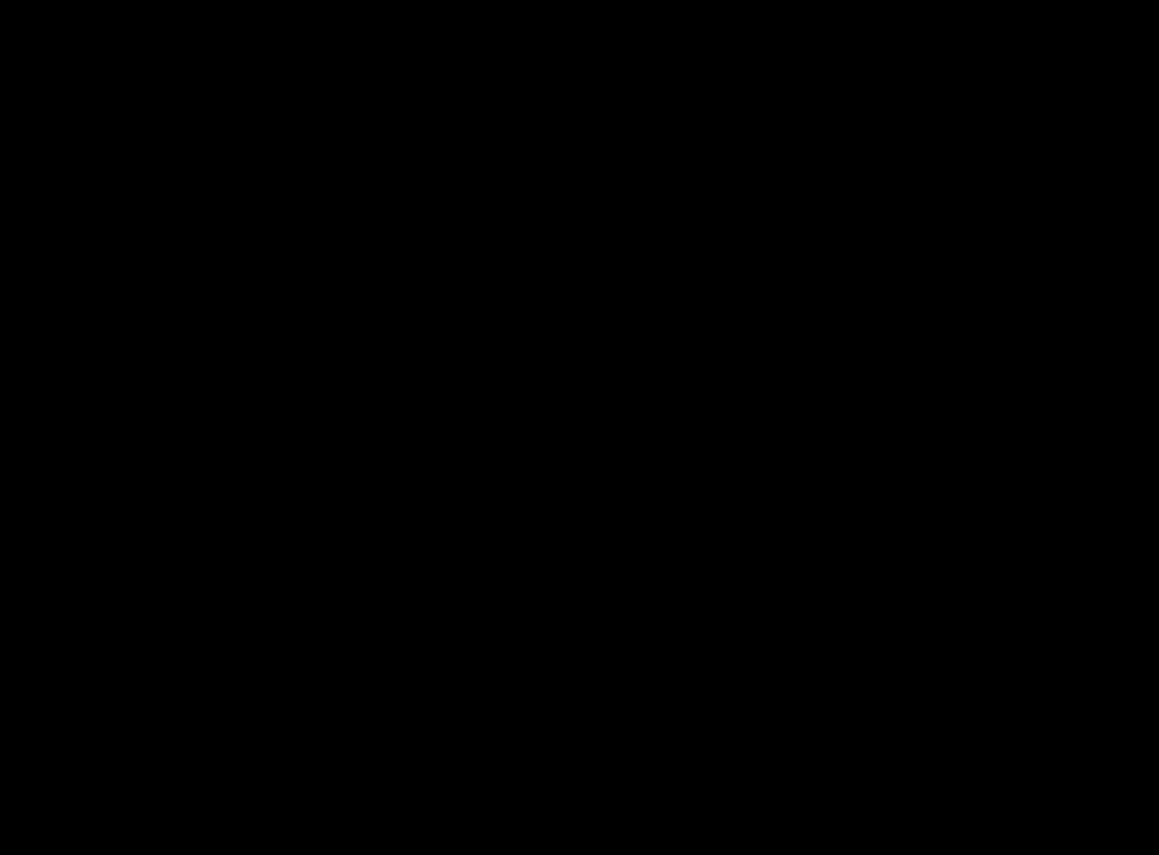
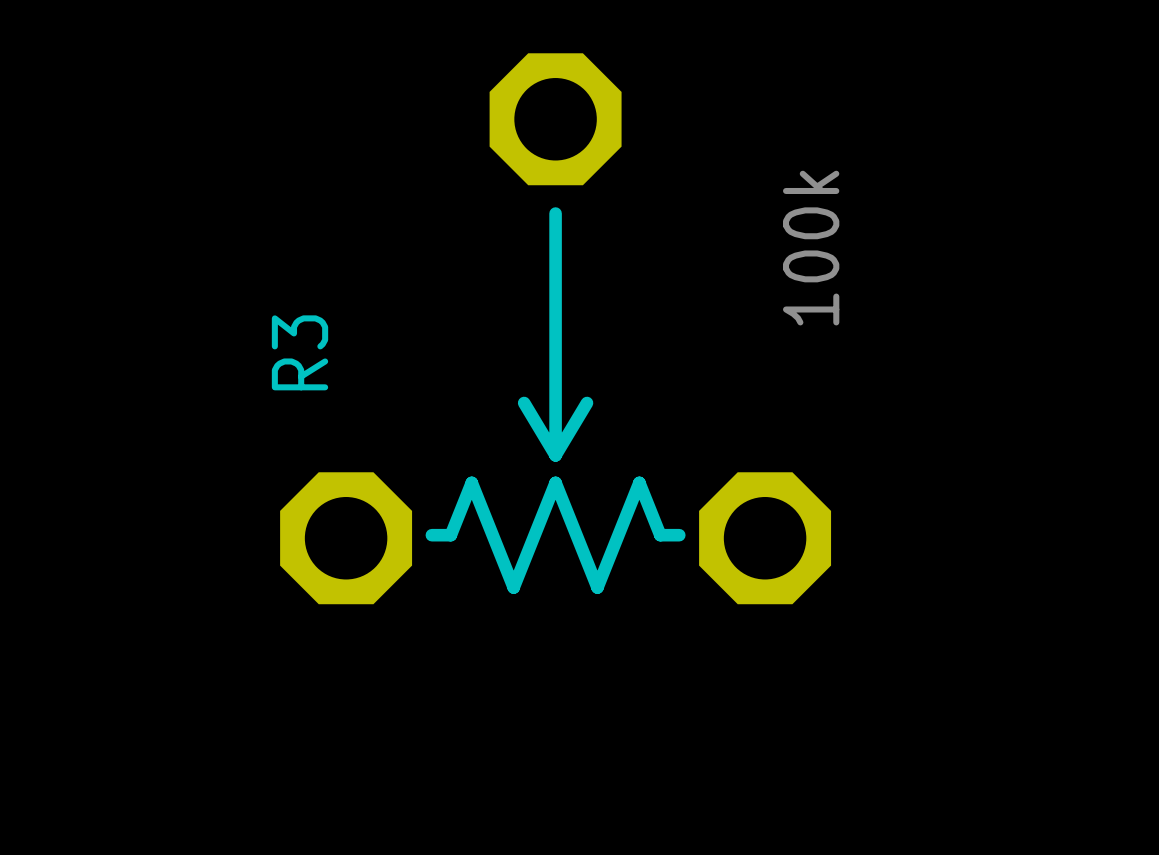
R3: none -> 100k (555, 328)

